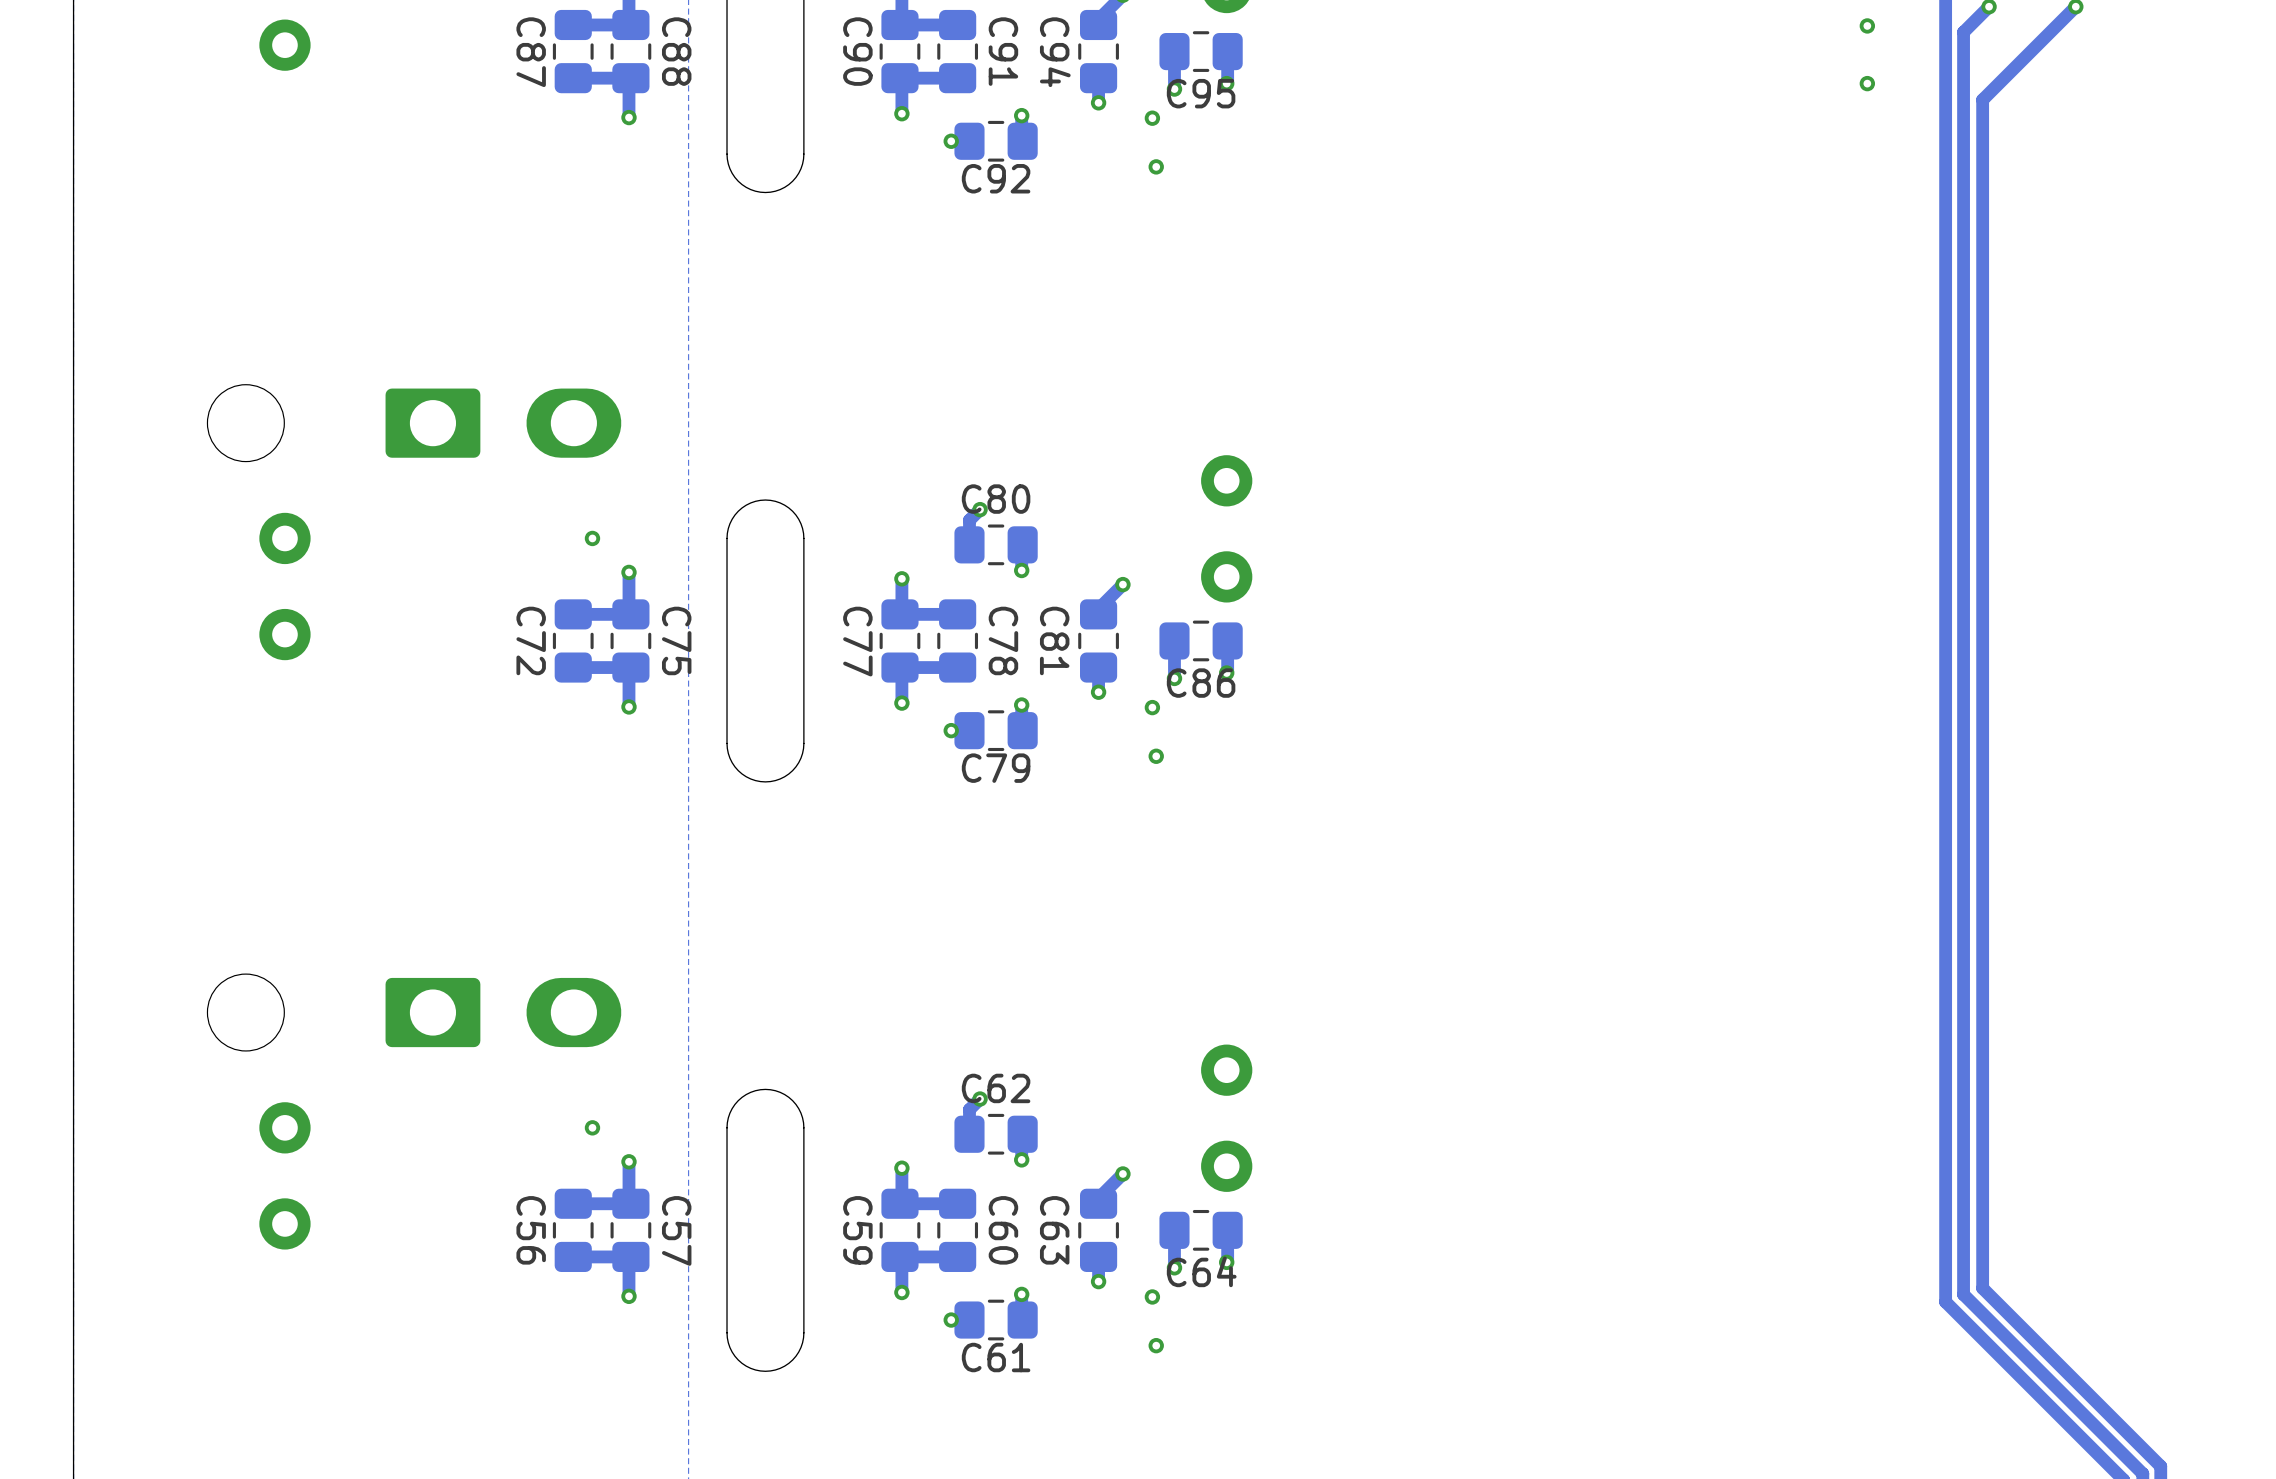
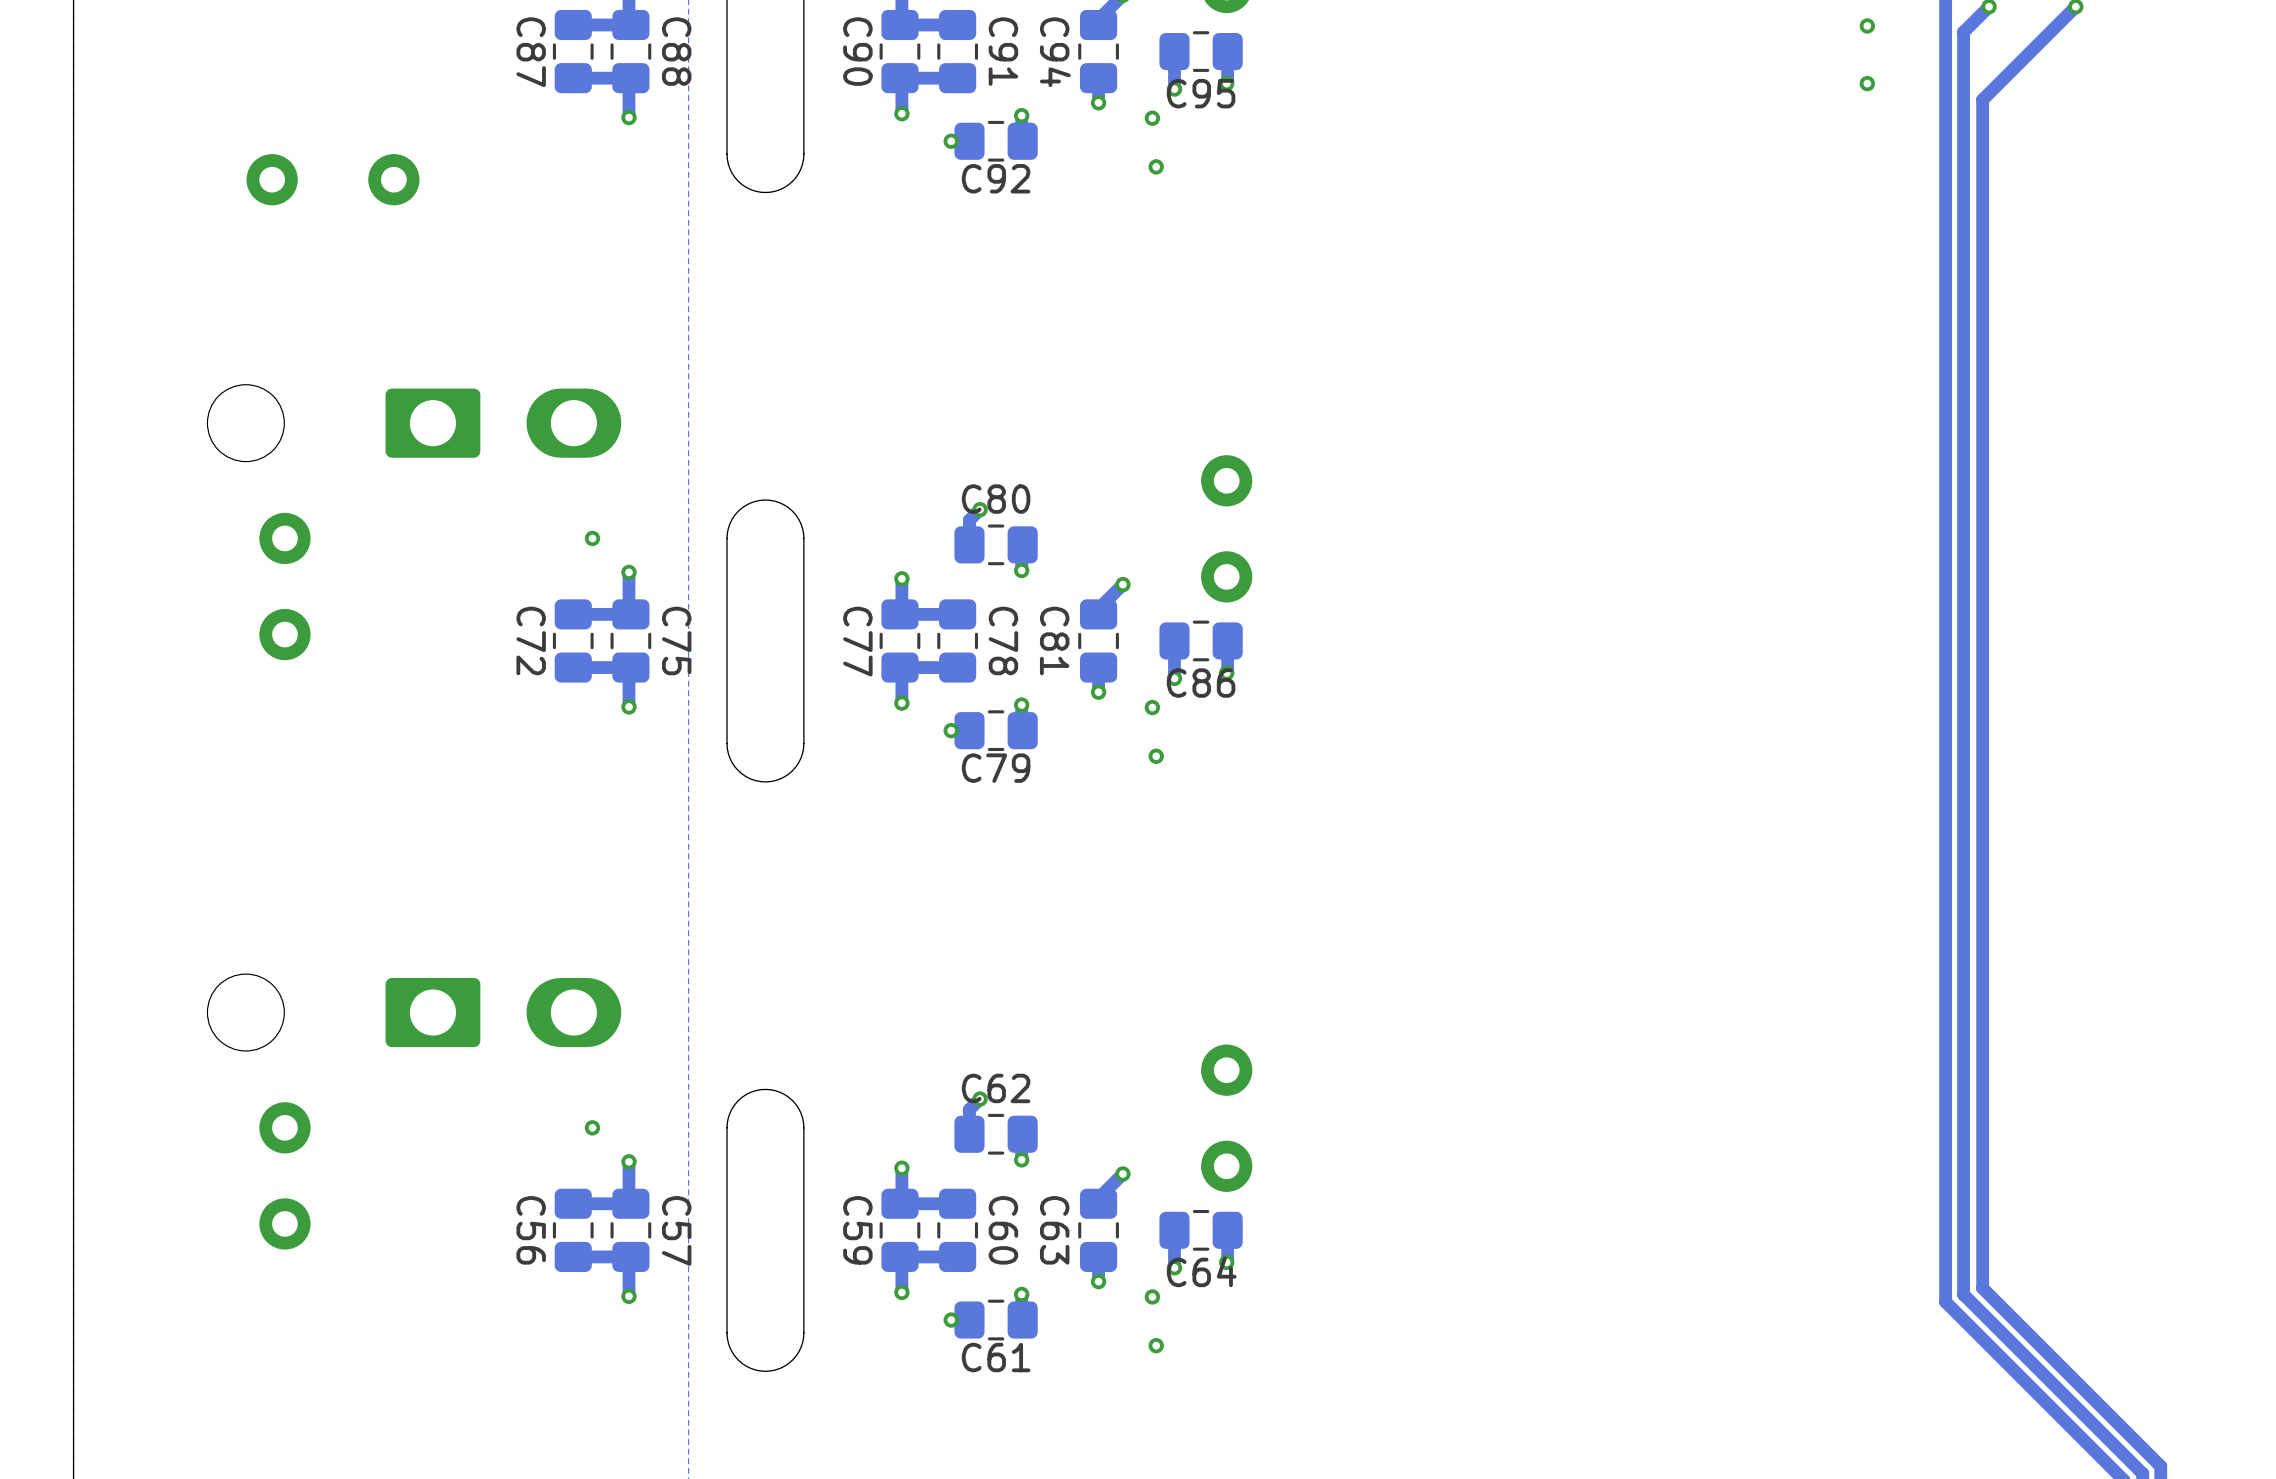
part: (284, 45) -> none
part: none -> (272, 179)
part: none -> (393, 179)

